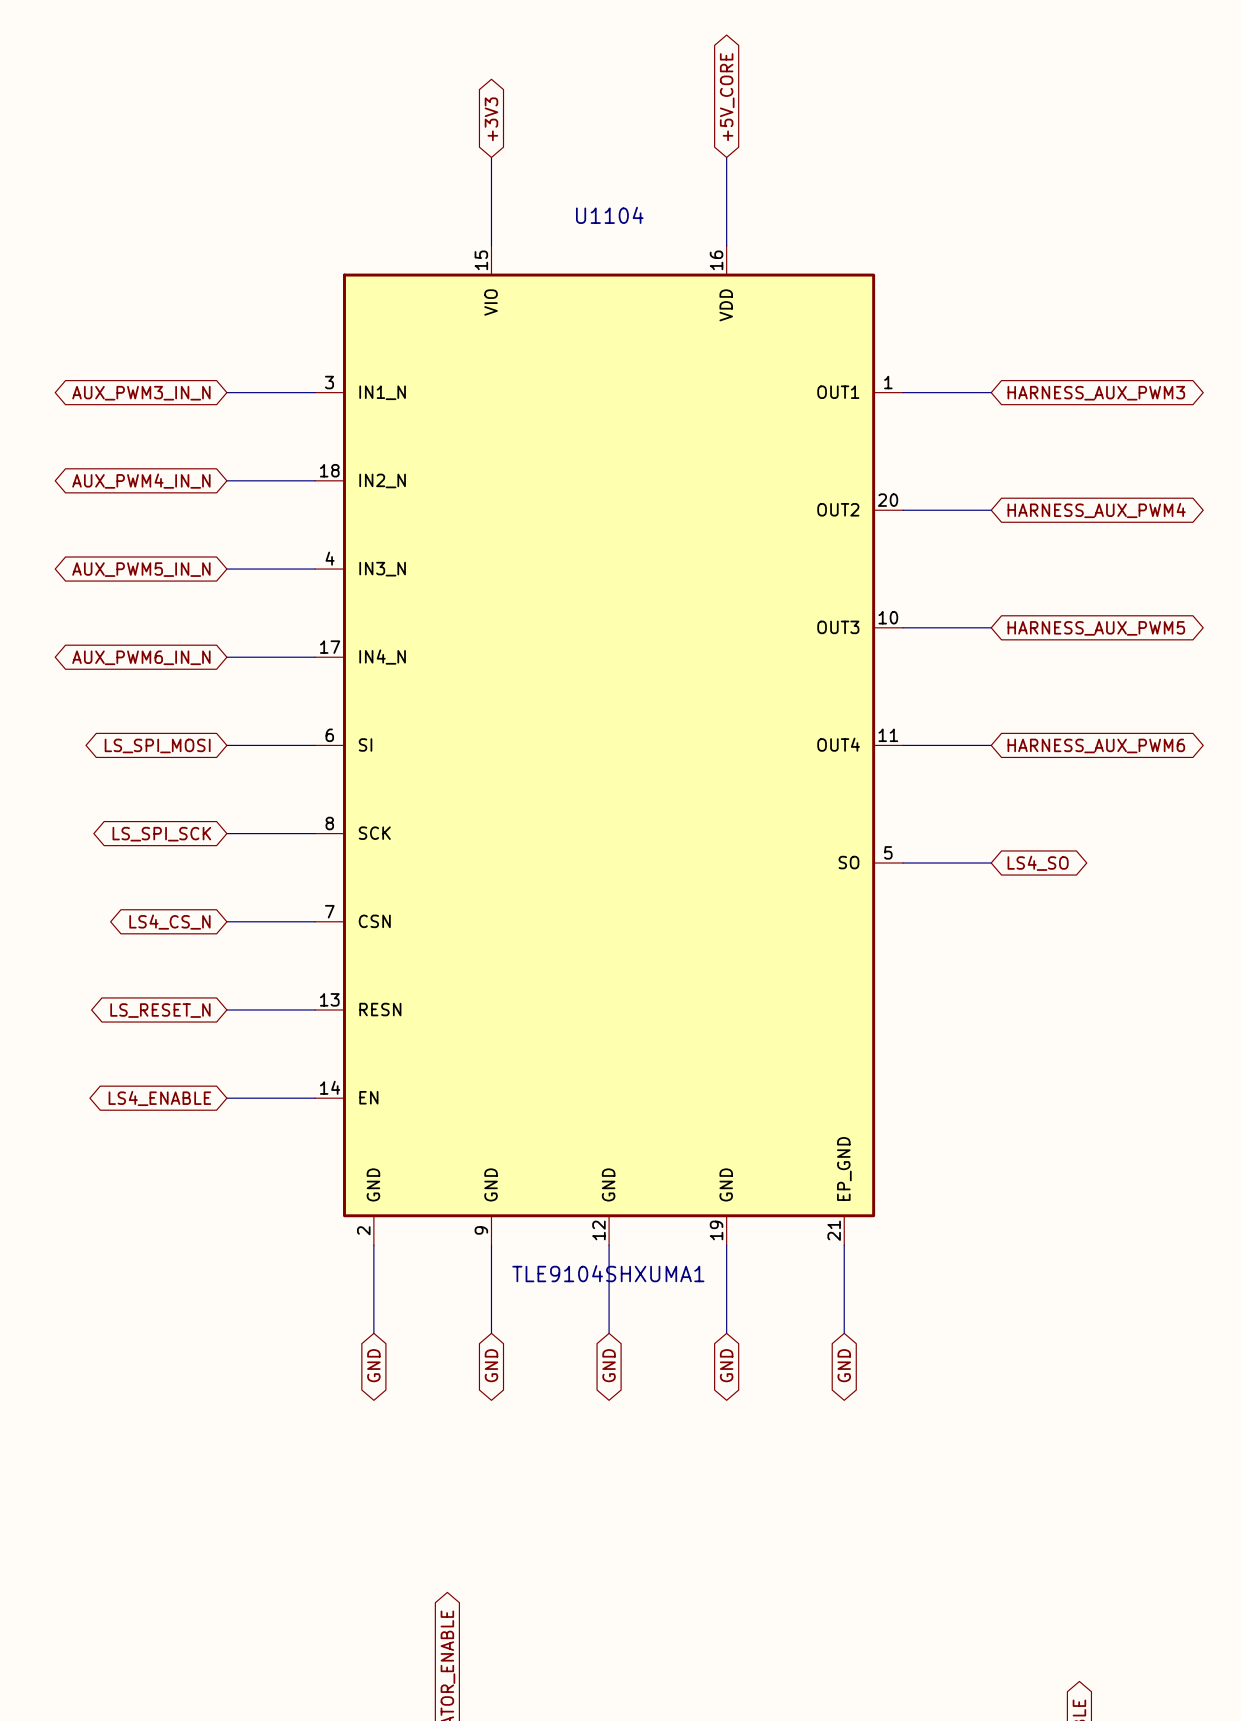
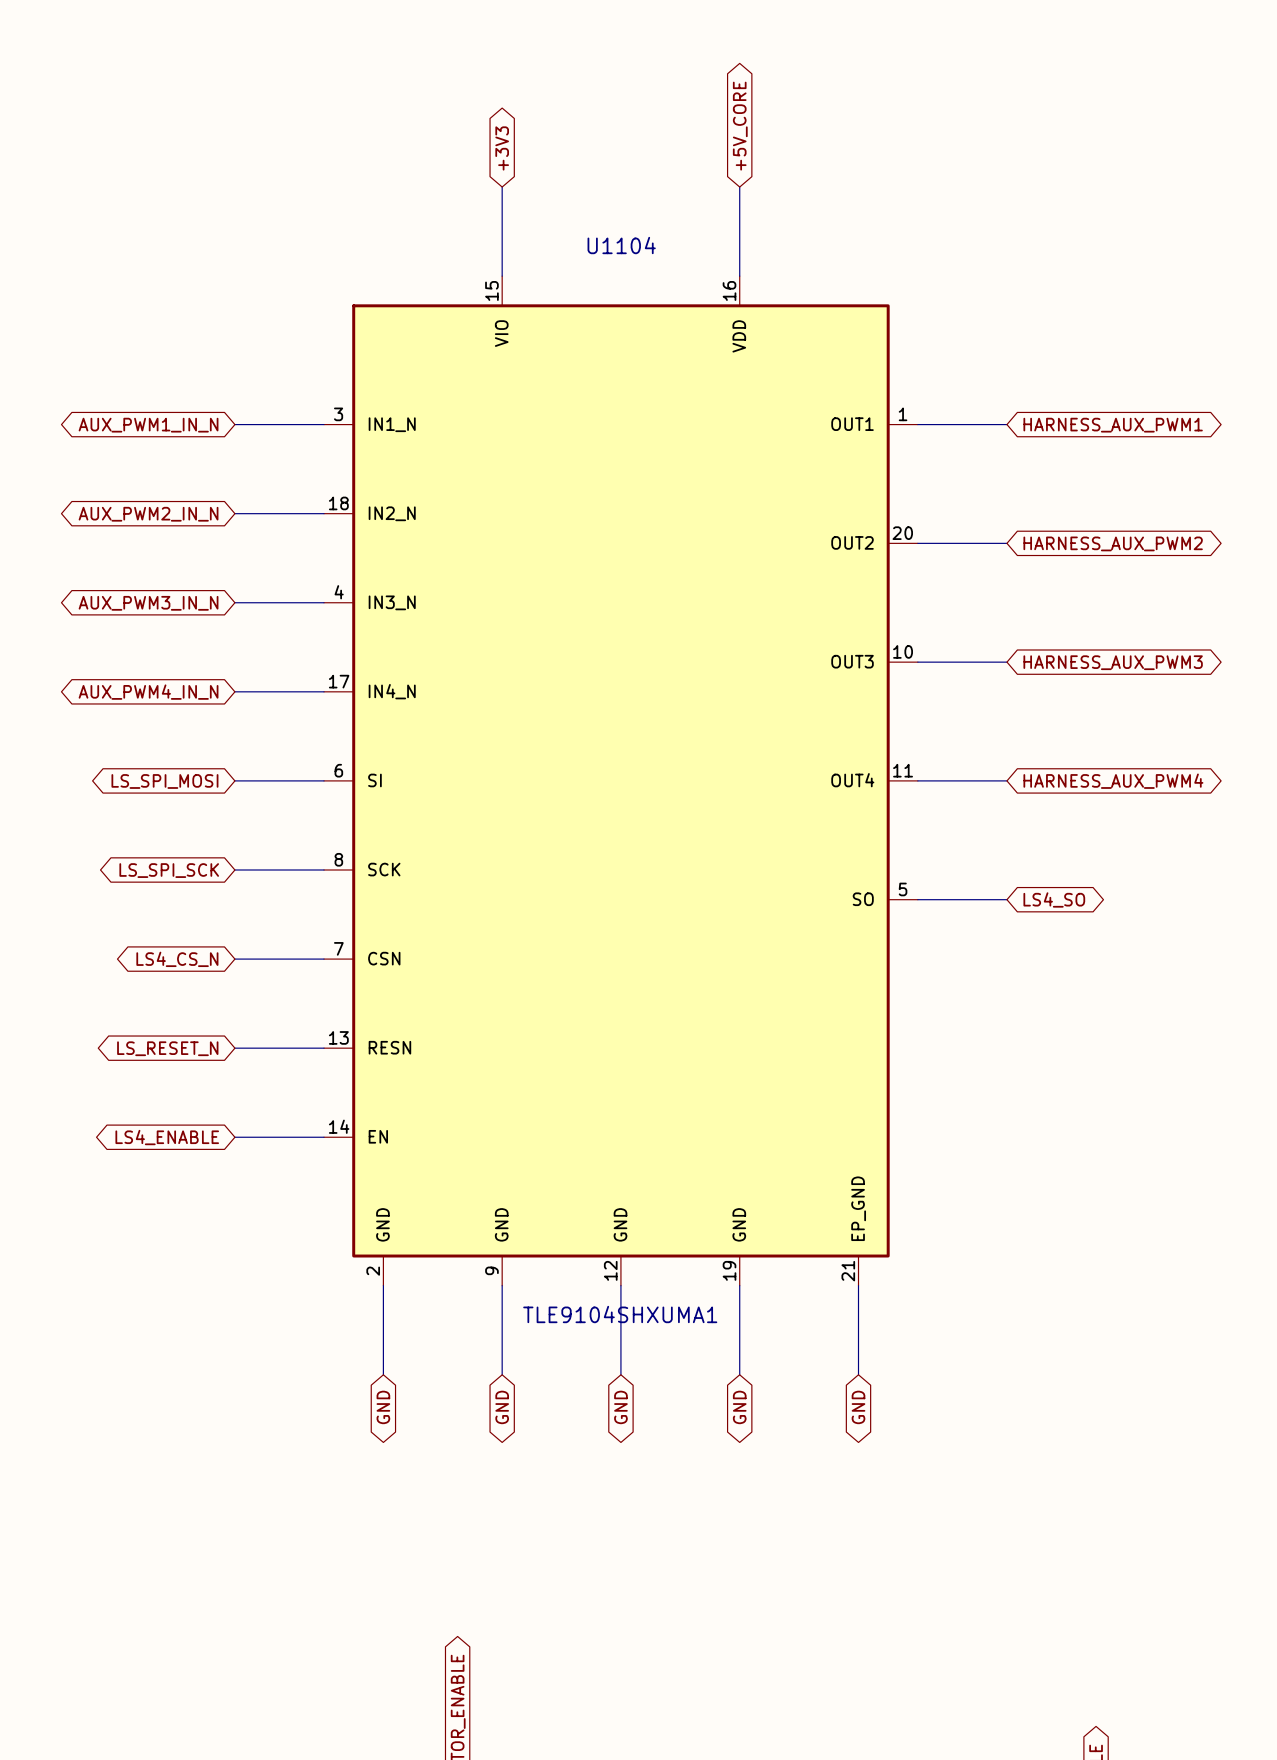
global label: AUX_PWM3_IN_N (141, 393) -> AUX_PWM1_IN_N (148, 425)
global label: HARNESS_AUX_PWM3 (1096, 393) -> HARNESS_AUX_PWM1 (1113, 425)
global label: AUX_PWM4_IN_N (141, 481) -> AUX_PWM2_IN_N (148, 514)
global label: HARNESS_AUX_PWM4 (1096, 510) -> HARNESS_AUX_PWM2 (1113, 543)
global label: AUX_PWM5_IN_N (141, 569) -> AUX_PWM3_IN_N (148, 603)
global label: HARNESS_AUX_PWM5 (1096, 628) -> HARNESS_AUX_PWM3 (1113, 662)
global label: AUX_PWM6_IN_N (141, 657) -> AUX_PWM4_IN_N (148, 692)
global label: HARNESS_AUX_PWM6 (1096, 745) -> HARNESS_AUX_PWM4 (1113, 781)

